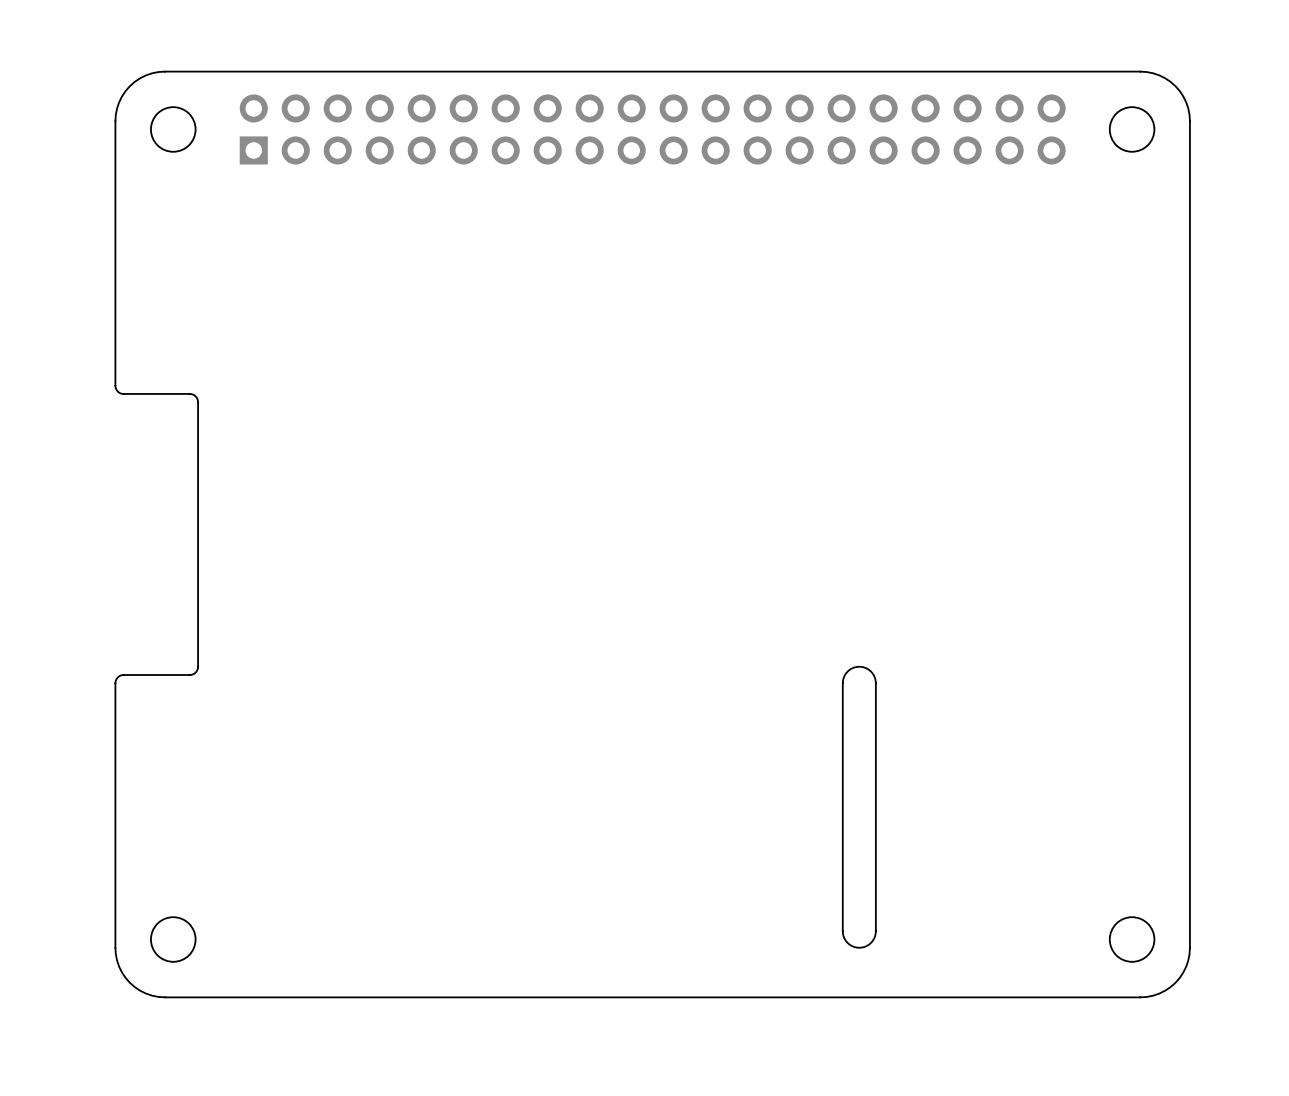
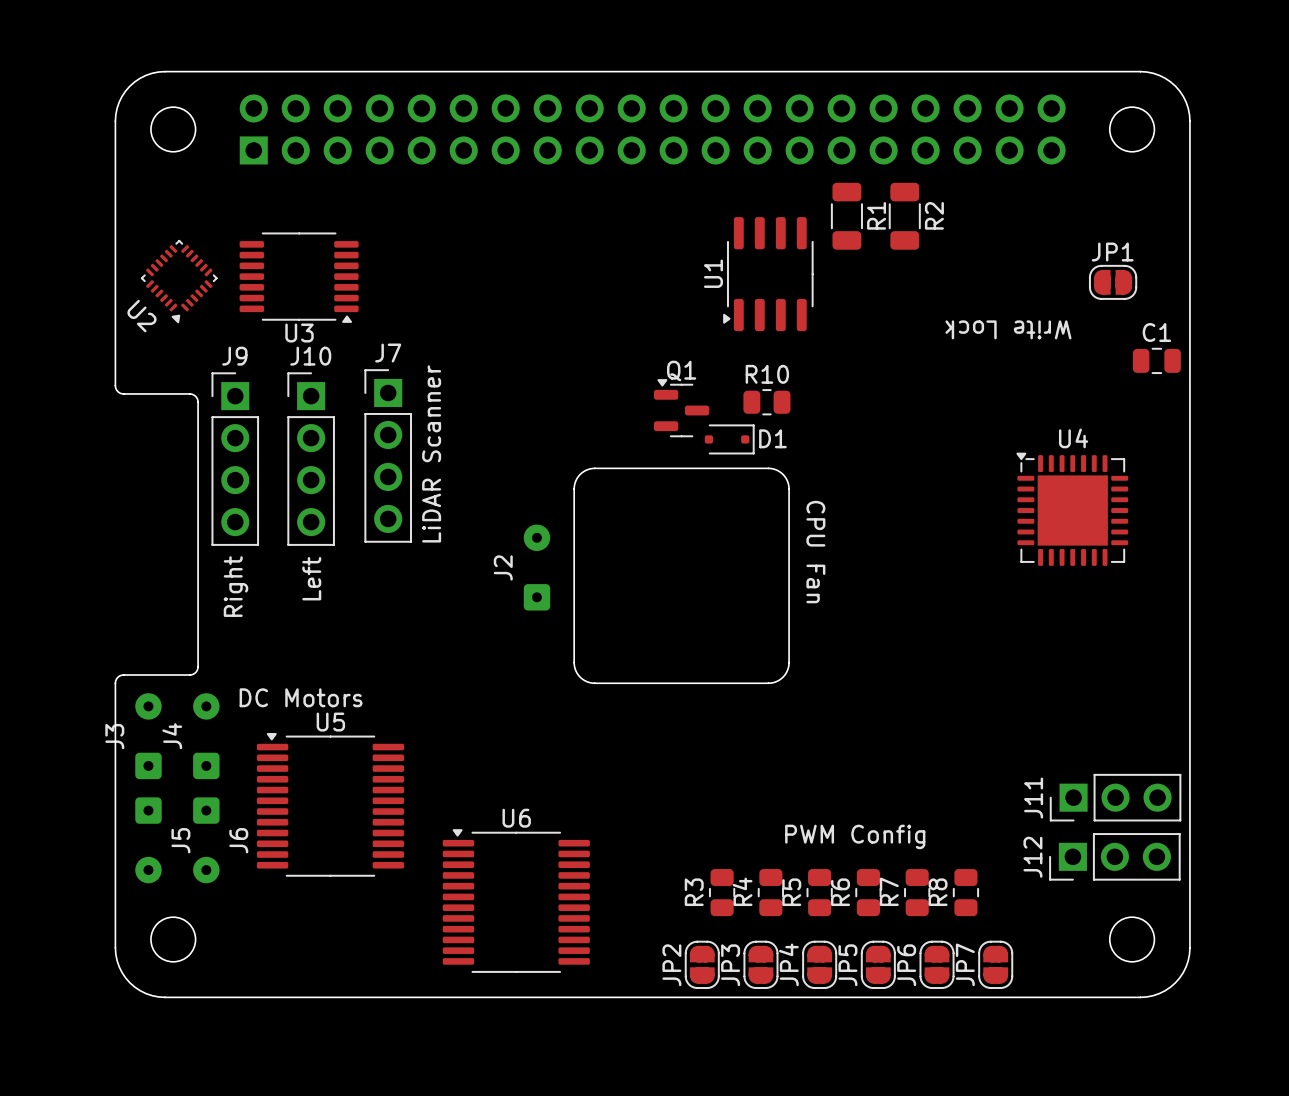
R1: none -> (846, 216)
R2: none -> (904, 216)
U1: none -> (768, 274)
U3: none -> (299, 277)
U2: none -> (179, 281)
JP1: none -> (1113, 282)
text: none -> Write Lock (1008, 329)
C1: none -> (1156, 360)
R10: none -> (766, 402)
Q1: none -> (681, 408)
D1: none -> (729, 439)
text: none -> LiDAR Scanner (431, 453)
J7: none -> (388, 455)
J9: none -> (235, 459)
J10: none -> (311, 459)
board edge: none -> (594, 468) (768, 468) (776, 469) (783, 474) (787, 481) (789, 489) (789, 662) (787, 670) (783, 677) (776, 681) (768, 683) (594, 683) (586, 681) (580, 677) (575, 670) (574, 662) (574, 486) (576, 478) (582, 472) (594, 468)
U4: none -> (1072, 509)
text: none -> CPU Fan (815, 552)
J2: none -> (536, 567)
text: none -> Left (311, 578)
text: none -> Right (235, 586)
board edge: (842, 683) (842, 933) (849, 944) (861, 947) (872, 941) (875, 931) (875, 681) (871, 671) (859, 666) (847, 671) (842, 683) -> none
text: none -> DC Motors (301, 697)
J3: none -> (148, 736)
J4: none -> (206, 736)
J11: none -> (1115, 797)
U5: none -> (330, 804)
text: none -> PWM Config (855, 836)
J5: none -> (148, 840)
J6: none -> (206, 840)
J12: none -> (1114, 856)
R3: none -> (722, 892)
R4: none -> (770, 892)
R5: none -> (819, 892)
R6: none -> (868, 892)
R7: none -> (917, 892)
R8: none -> (965, 892)
U6: none -> (516, 901)
JP2: none -> (702, 964)
JP3: none -> (760, 964)
JP4: none -> (819, 964)
JP5: none -> (878, 964)
JP6: none -> (937, 964)
JP7: none -> (995, 964)

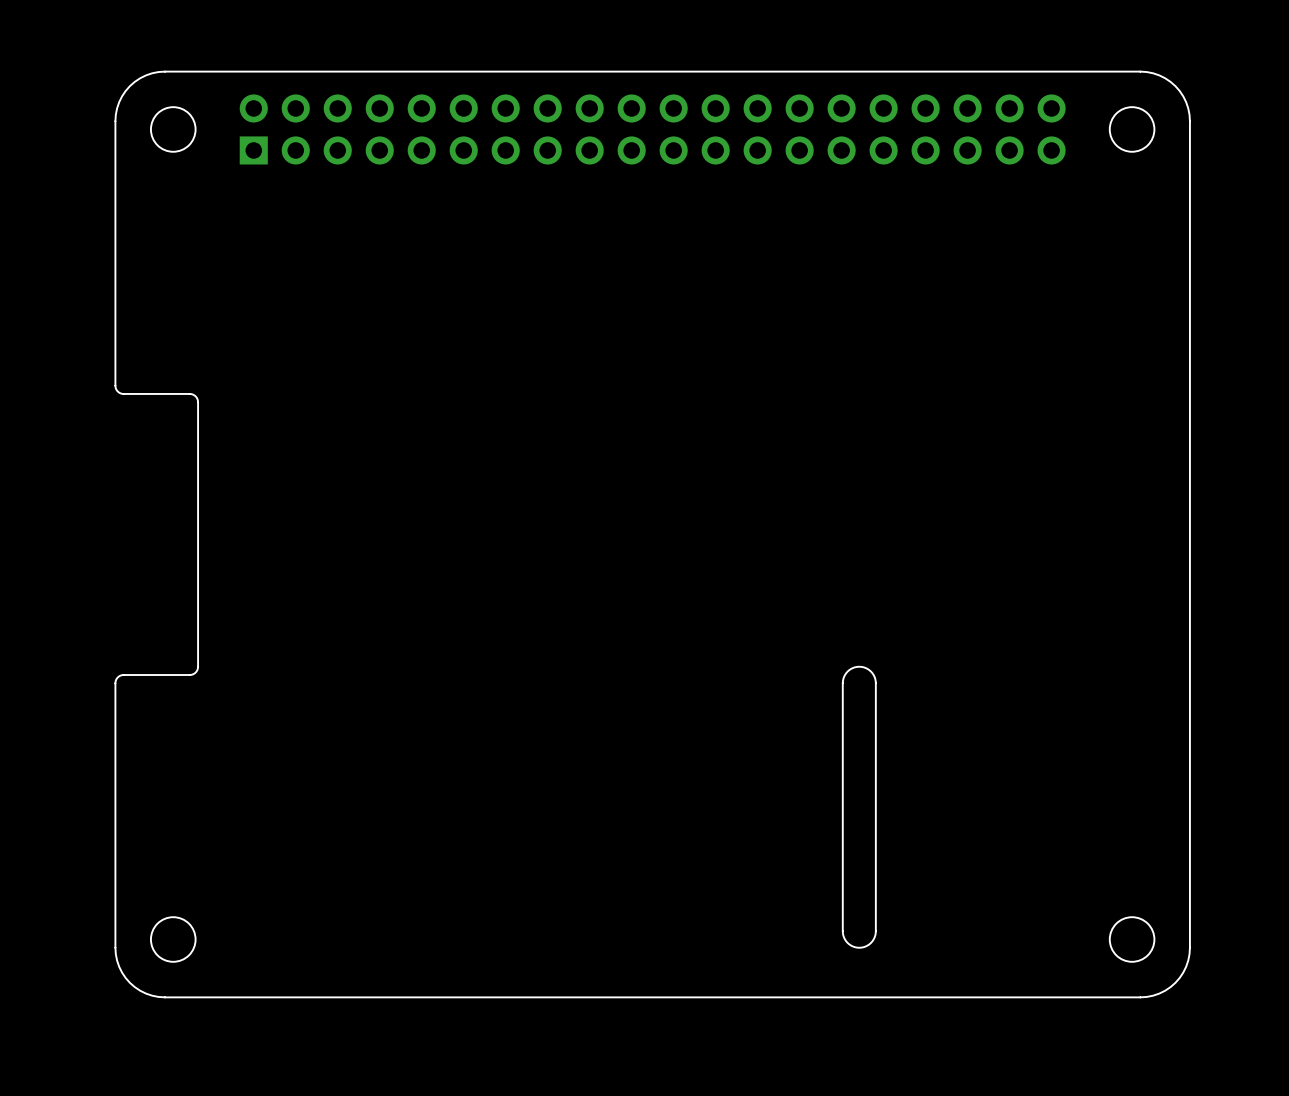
R1: (846, 216) -> none
R2: (904, 216) -> none
U1: (768, 274) -> none
U3: (299, 277) -> none
U2: (179, 281) -> none
JP1: (1113, 282) -> none
text: Write Lock (1008, 329) -> none
C1: (1156, 360) -> none
R10: (766, 402) -> none
Q1: (681, 408) -> none
D1: (729, 439) -> none
text: LiDAR Scanner (431, 453) -> none
J7: (388, 455) -> none
J9: (235, 459) -> none
J10: (311, 459) -> none
board edge: (594, 468) (768, 468) (776, 469) (783, 474) (787, 481) (789, 489) (789, 662) (787, 670) (783, 677) (776, 681) (768, 683) (594, 683) (586, 681) (580, 677) (575, 670) (574, 662) (574, 486) (576, 478) (582, 472) (594, 468) -> none
U4: (1072, 509) -> none
text: CPU Fan (815, 552) -> none
J2: (536, 567) -> none
text: Left (311, 578) -> none
text: Right (235, 586) -> none
board edge: none -> (842, 683) (842, 933) (849, 944) (861, 947) (872, 941) (875, 931) (875, 681) (871, 671) (859, 666) (847, 671) (842, 683)
text: DC Motors (301, 697) -> none
J3: (148, 736) -> none
J4: (206, 736) -> none
J11: (1115, 797) -> none
U5: (330, 804) -> none
text: PWM Config (855, 836) -> none
J5: (148, 840) -> none
J6: (206, 840) -> none
J12: (1114, 856) -> none
R3: (722, 892) -> none
R4: (770, 892) -> none
R5: (819, 892) -> none
R6: (868, 892) -> none
R7: (917, 892) -> none
R8: (965, 892) -> none
U6: (516, 901) -> none
JP2: (702, 964) -> none
JP3: (760, 964) -> none
JP4: (819, 964) -> none
JP5: (878, 964) -> none
JP6: (937, 964) -> none
JP7: (995, 964) -> none

